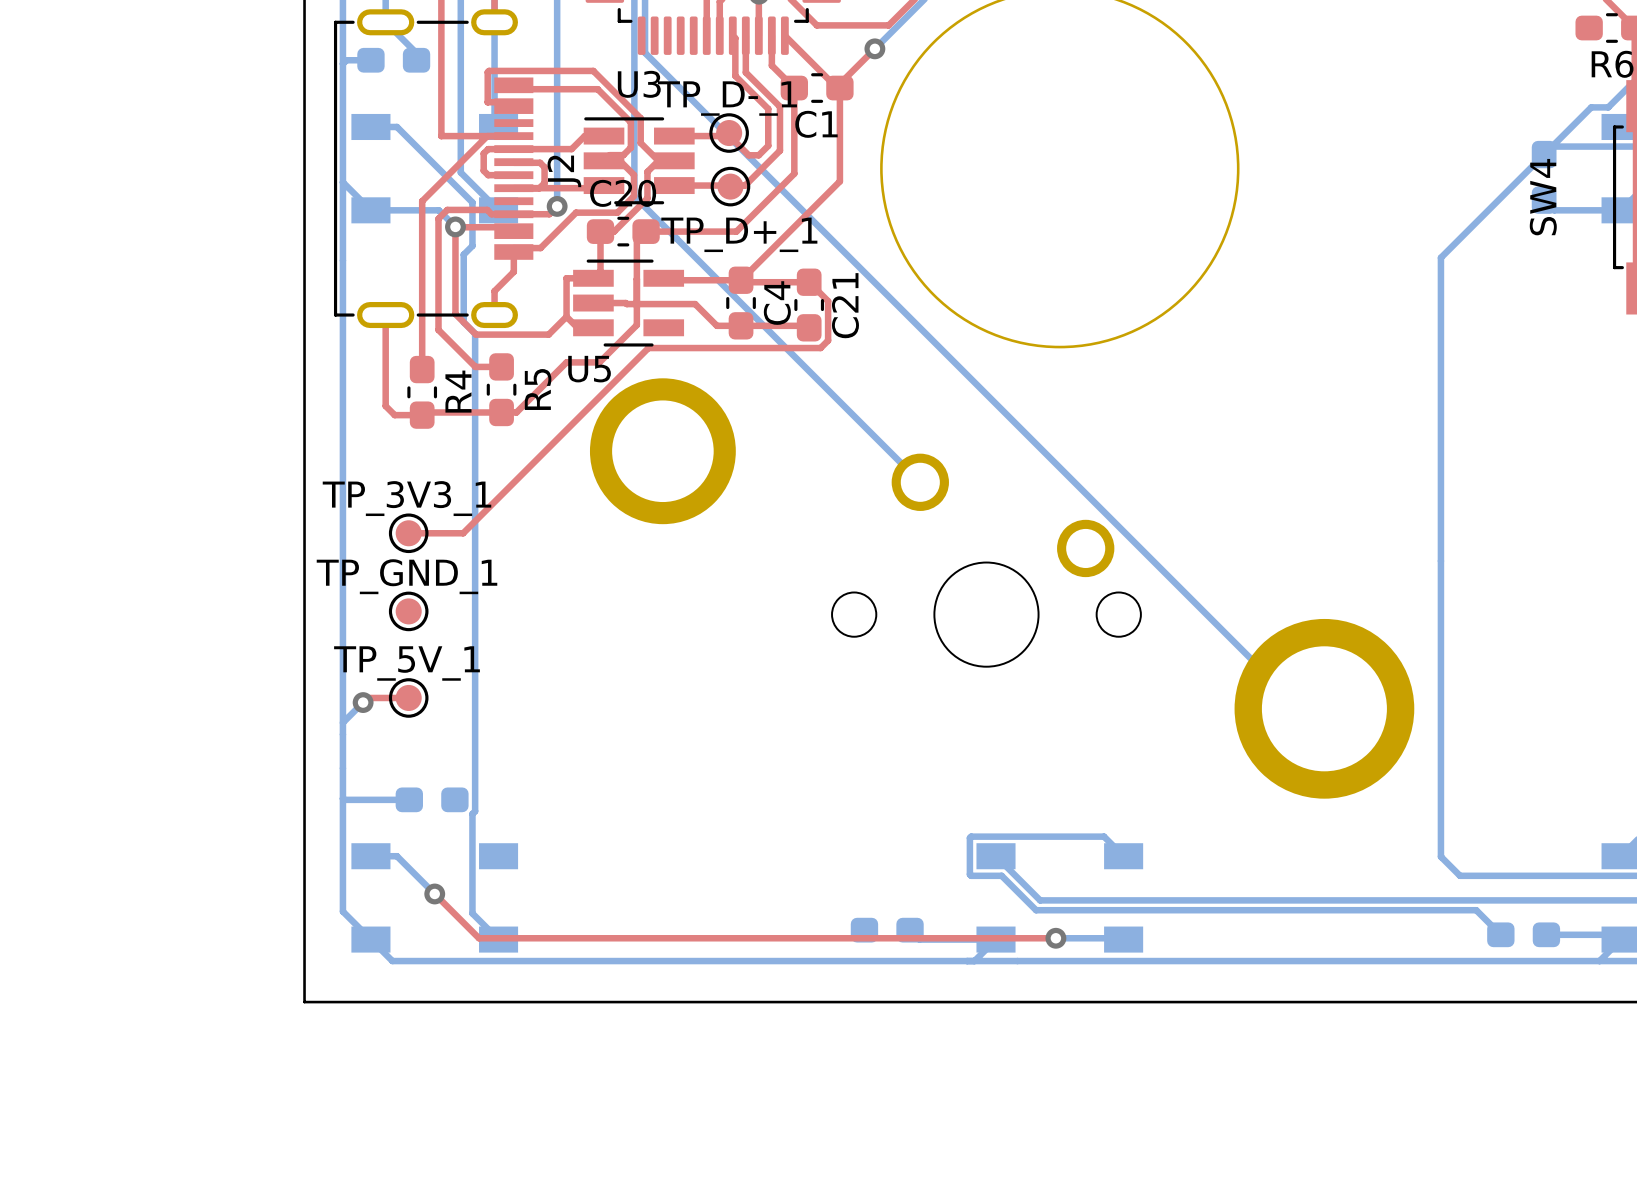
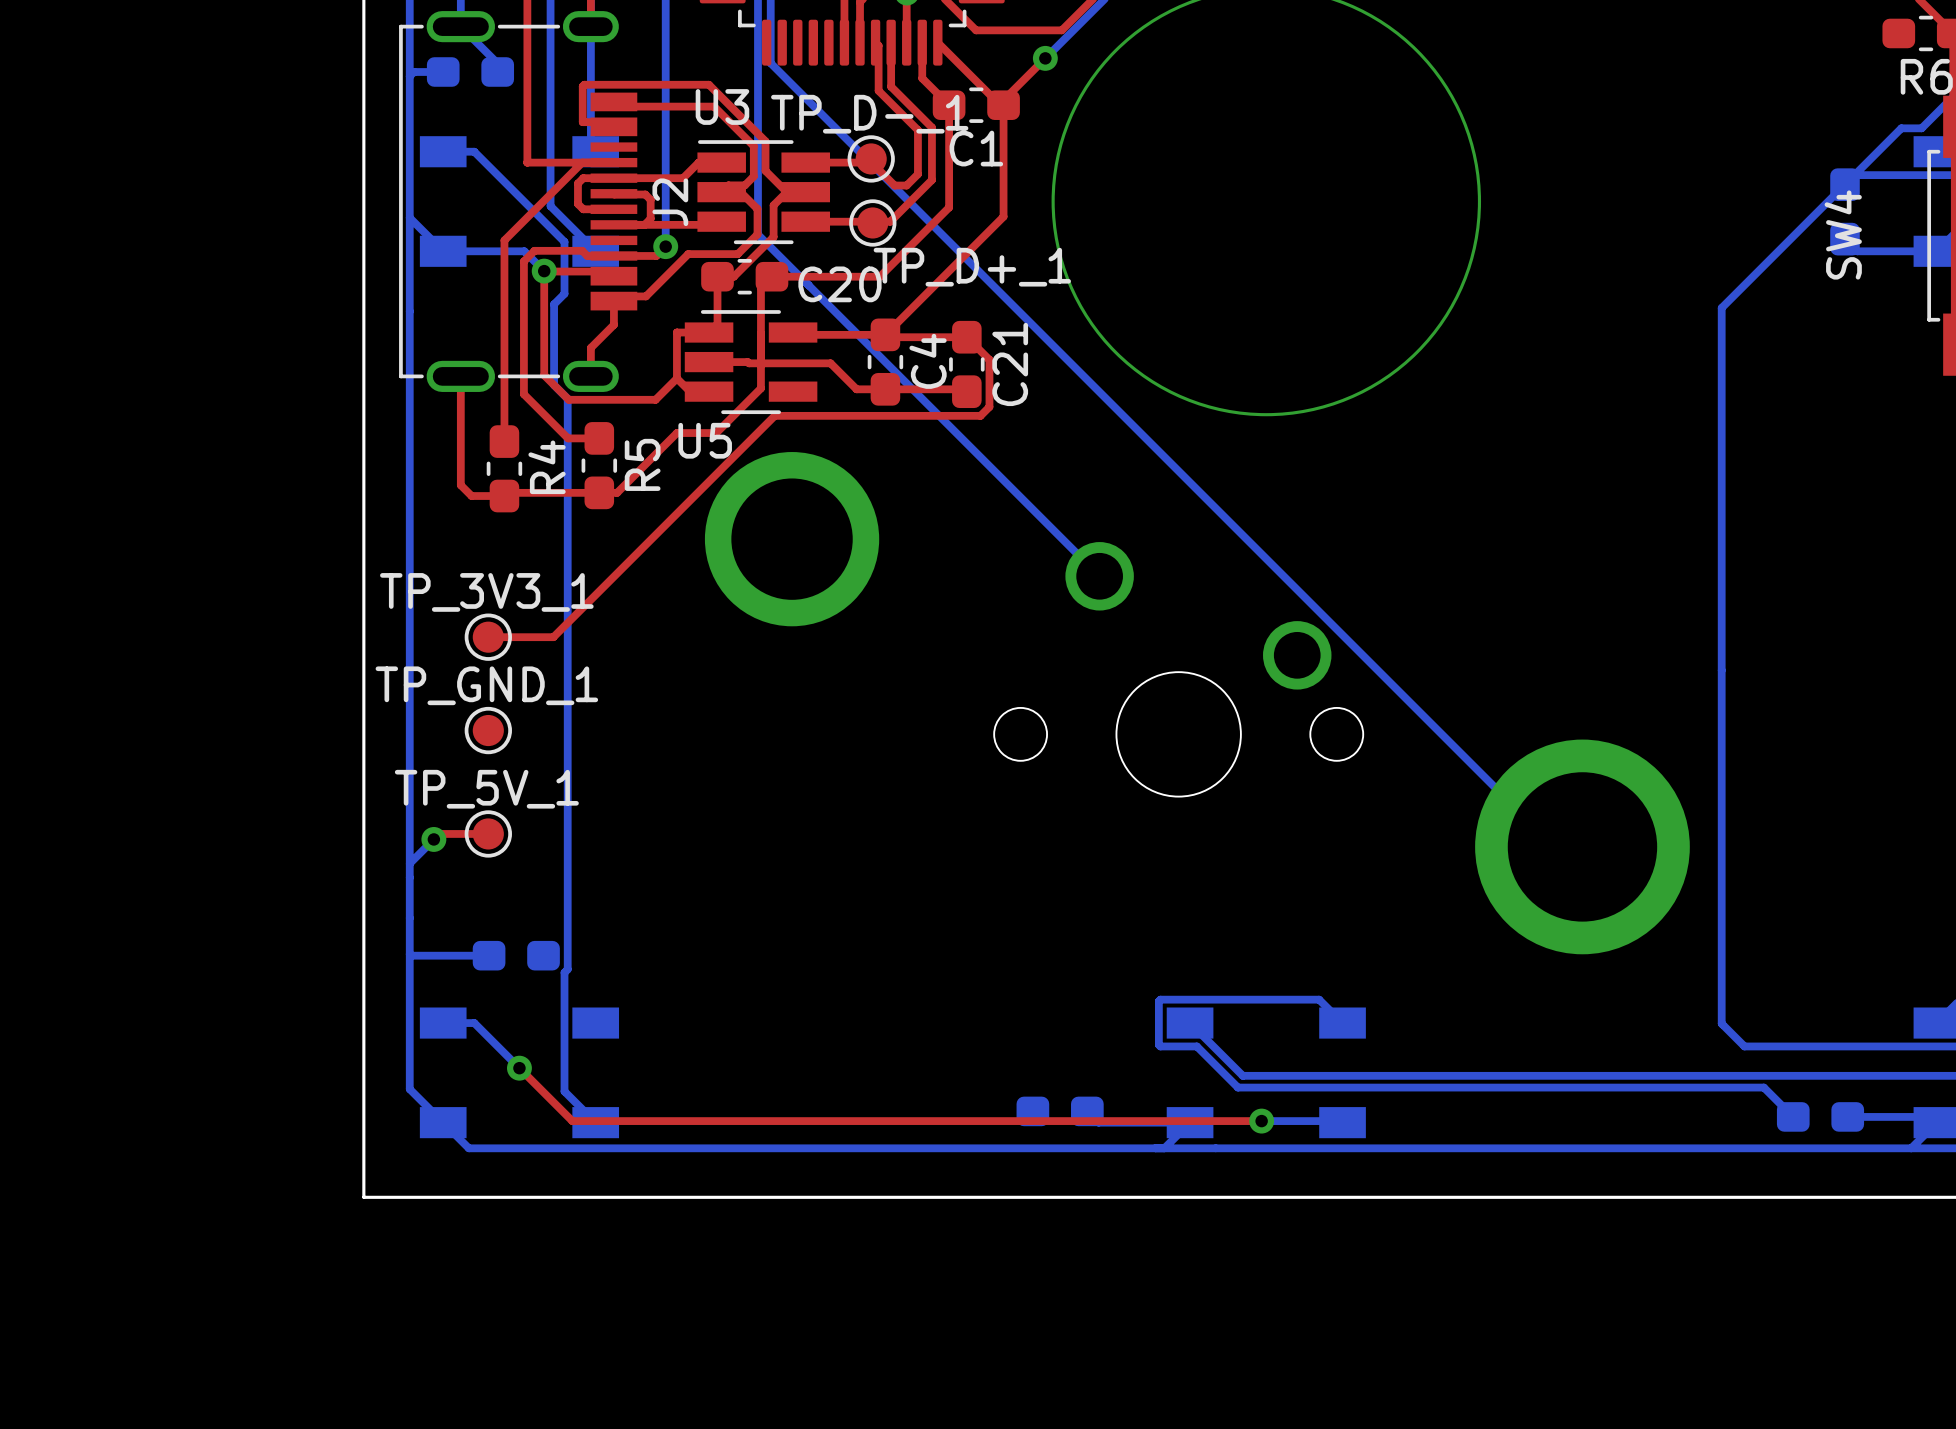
U3 name position: U3 (639, 84) -> U3 (722, 106)
C20 name position: C20 (623, 193) -> C20 (839, 284)
TP_D+_1 name position: TP_D+_1 (739, 234) -> TP_D+_1 (972, 267)

